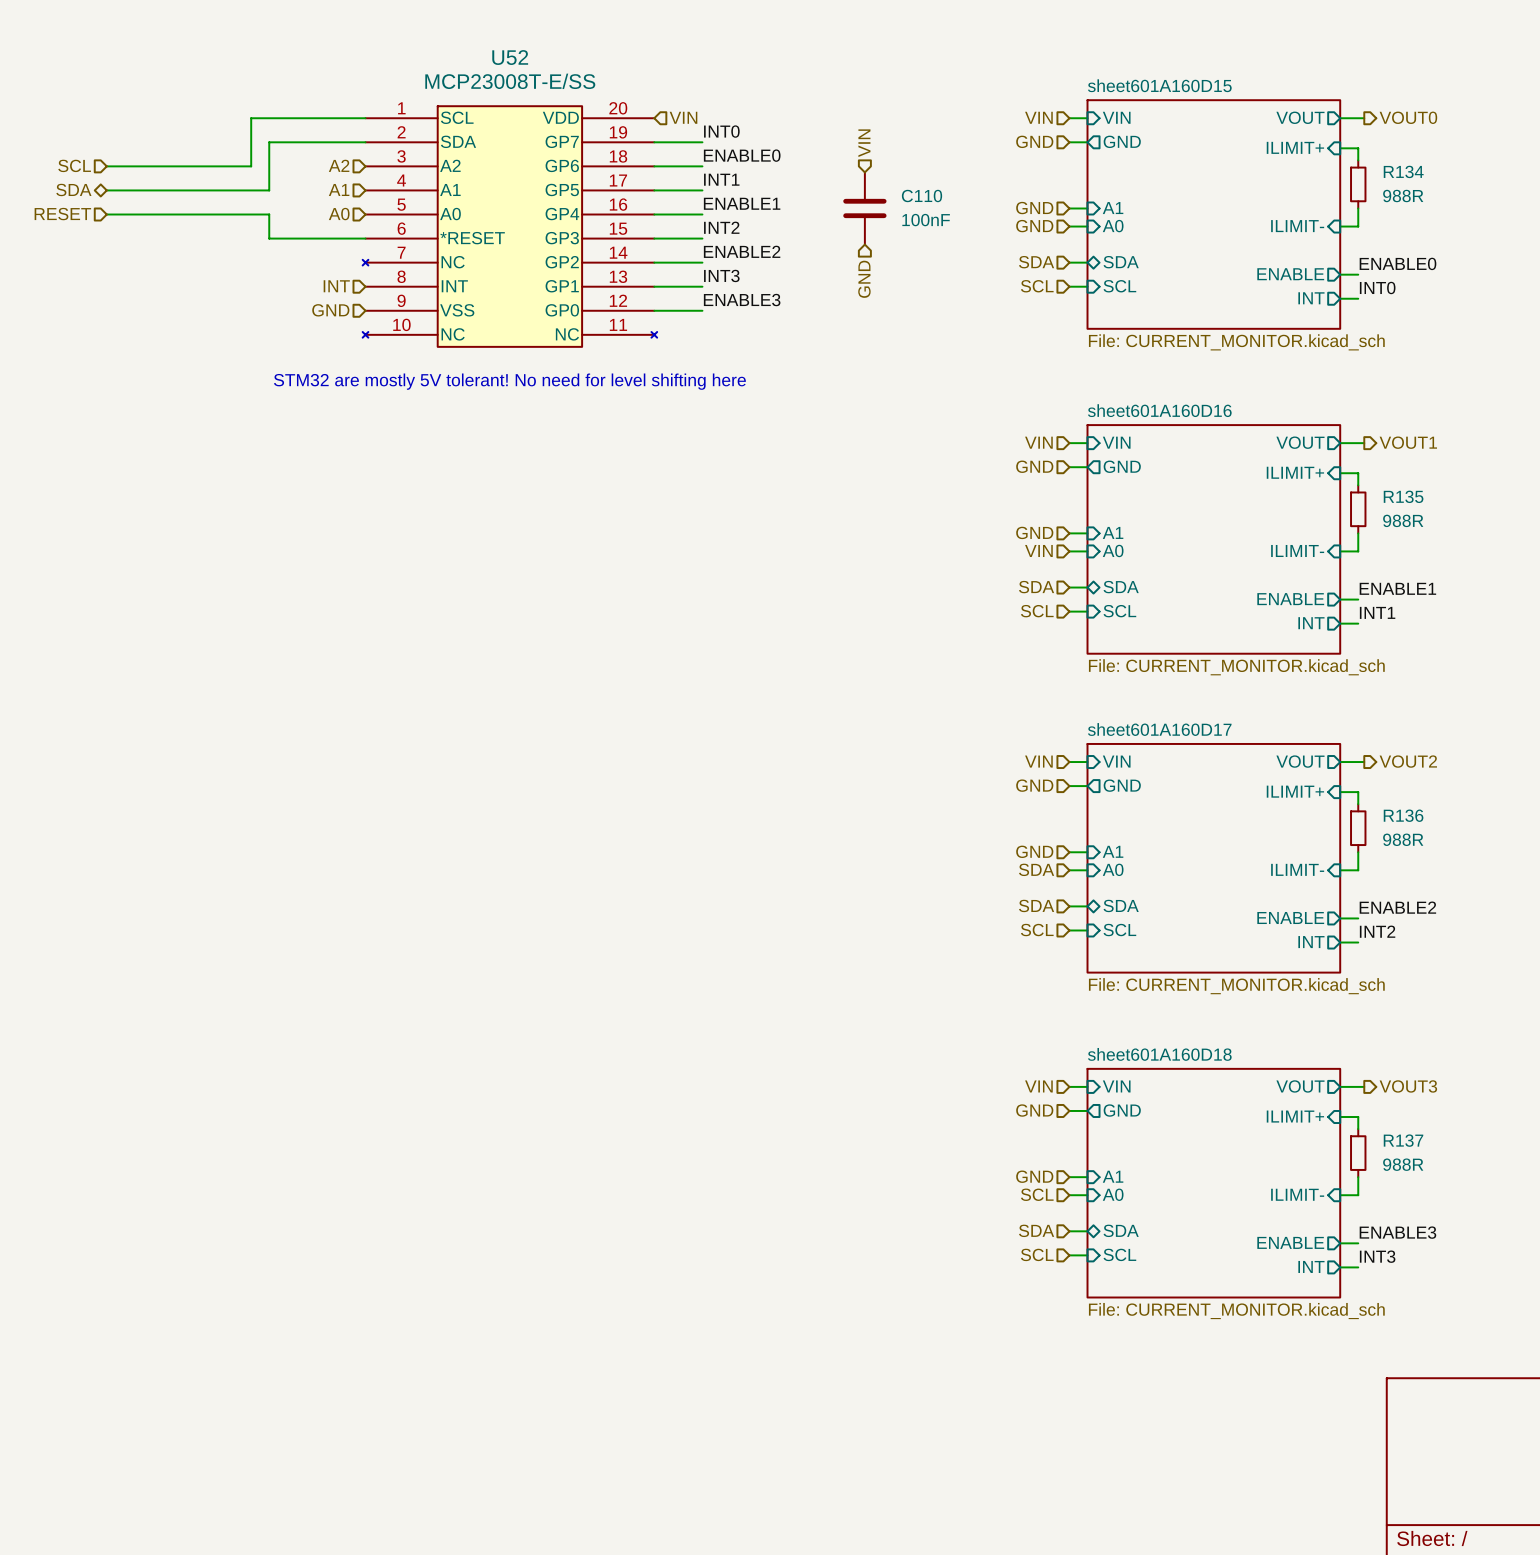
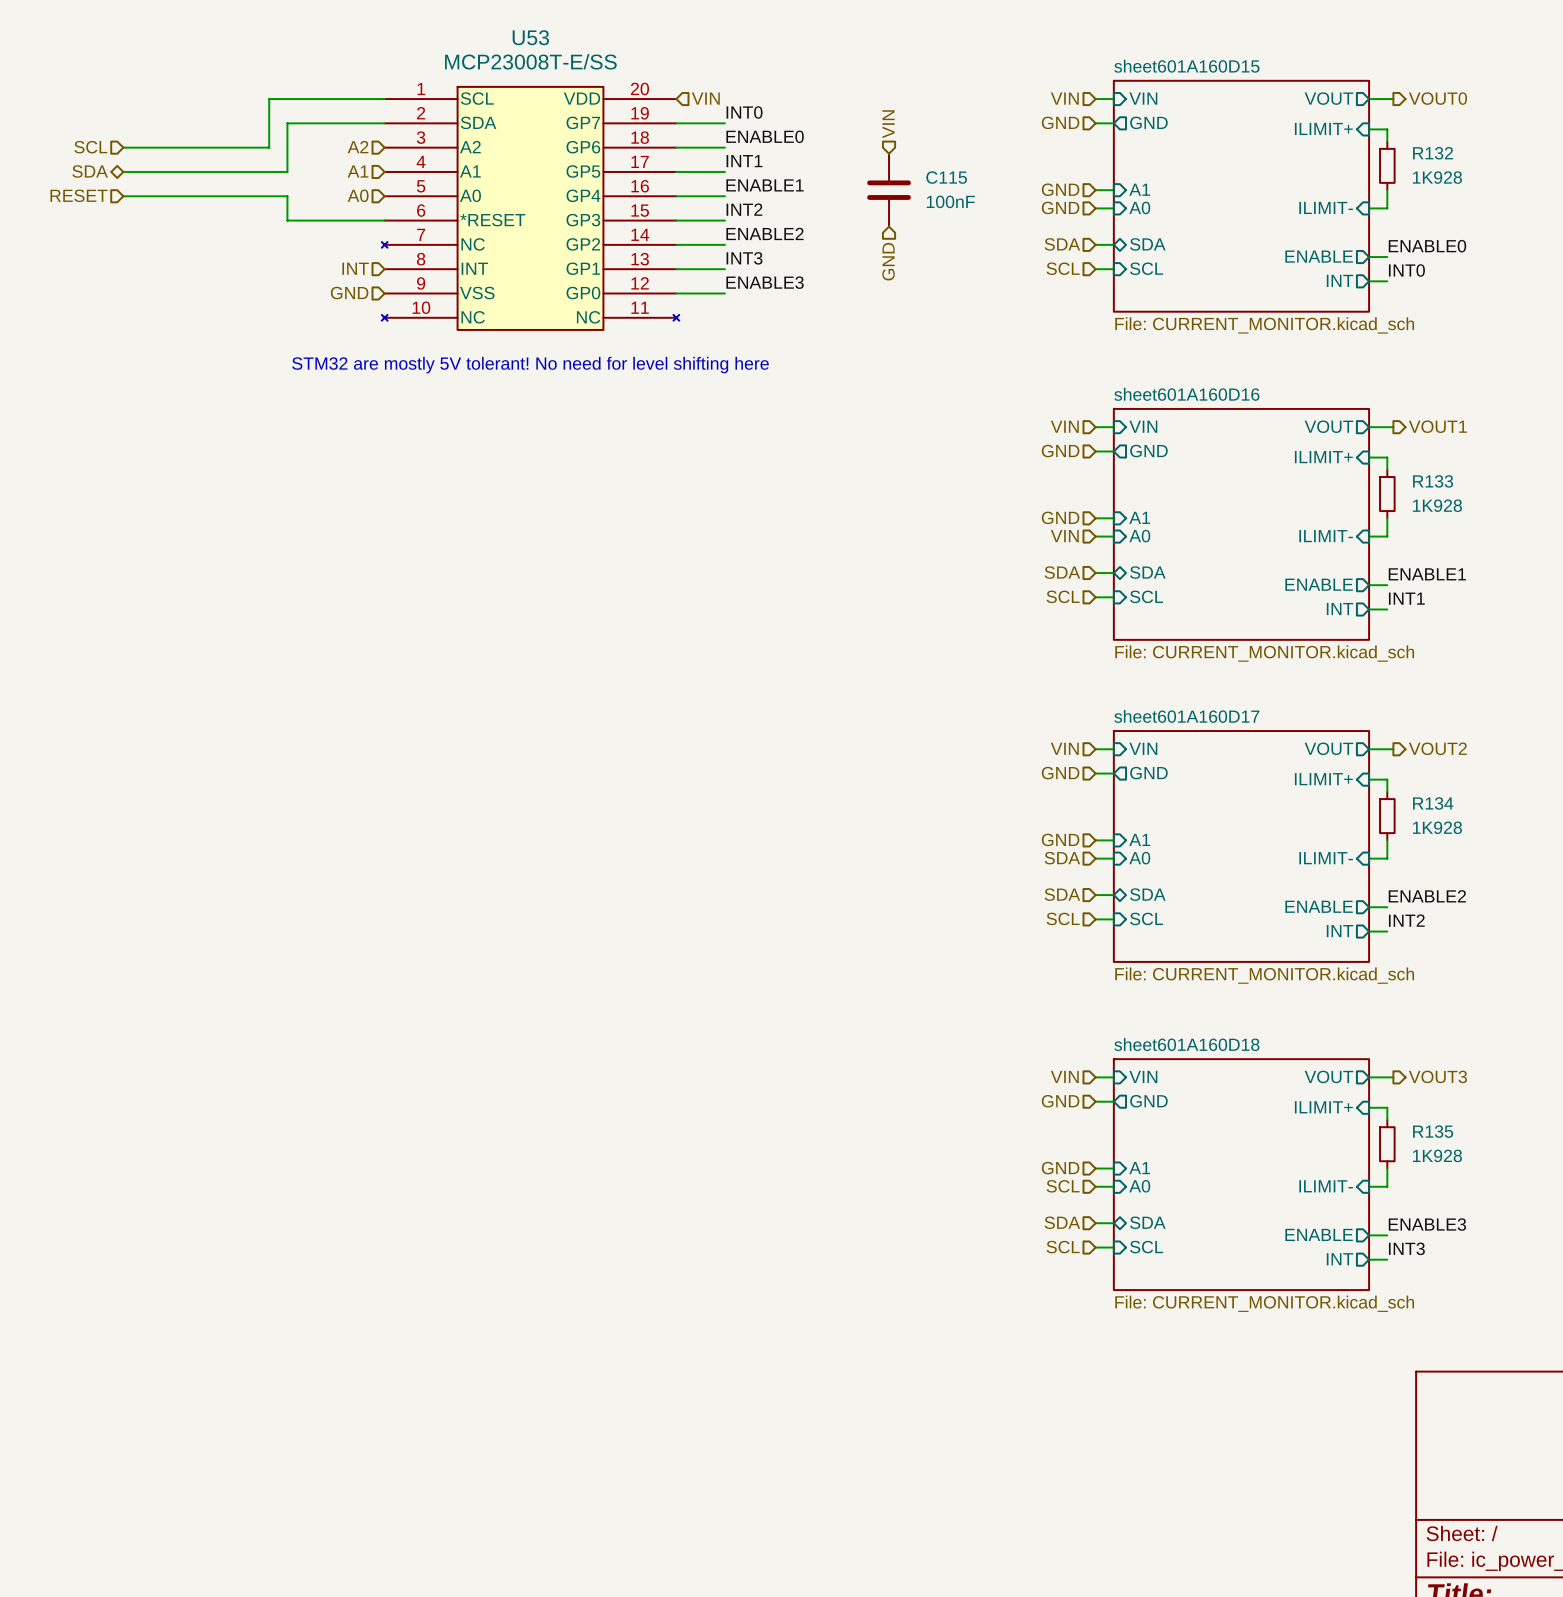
U52 name: U52 (510, 57) -> U53 (530, 37)
R134 name: R134 (1403, 171) -> R132 (1433, 153)
C110 name: C110 (922, 196) -> C115 (946, 177)
R134 value: 988R (1403, 196) -> 1K928 (1437, 177)
R135 name: R135 (1403, 496) -> R133 (1433, 481)
R135 value: 988R (1403, 520) -> 1K928 (1437, 505)
R136 name: R136 (1403, 815) -> R134 (1433, 803)
R136 value: 988R (1403, 839) -> 1K928 (1437, 827)
R137 name: R137 (1403, 1140) -> R135 (1433, 1131)
R137 value: 988R (1403, 1164) -> 1K928 (1437, 1155)

